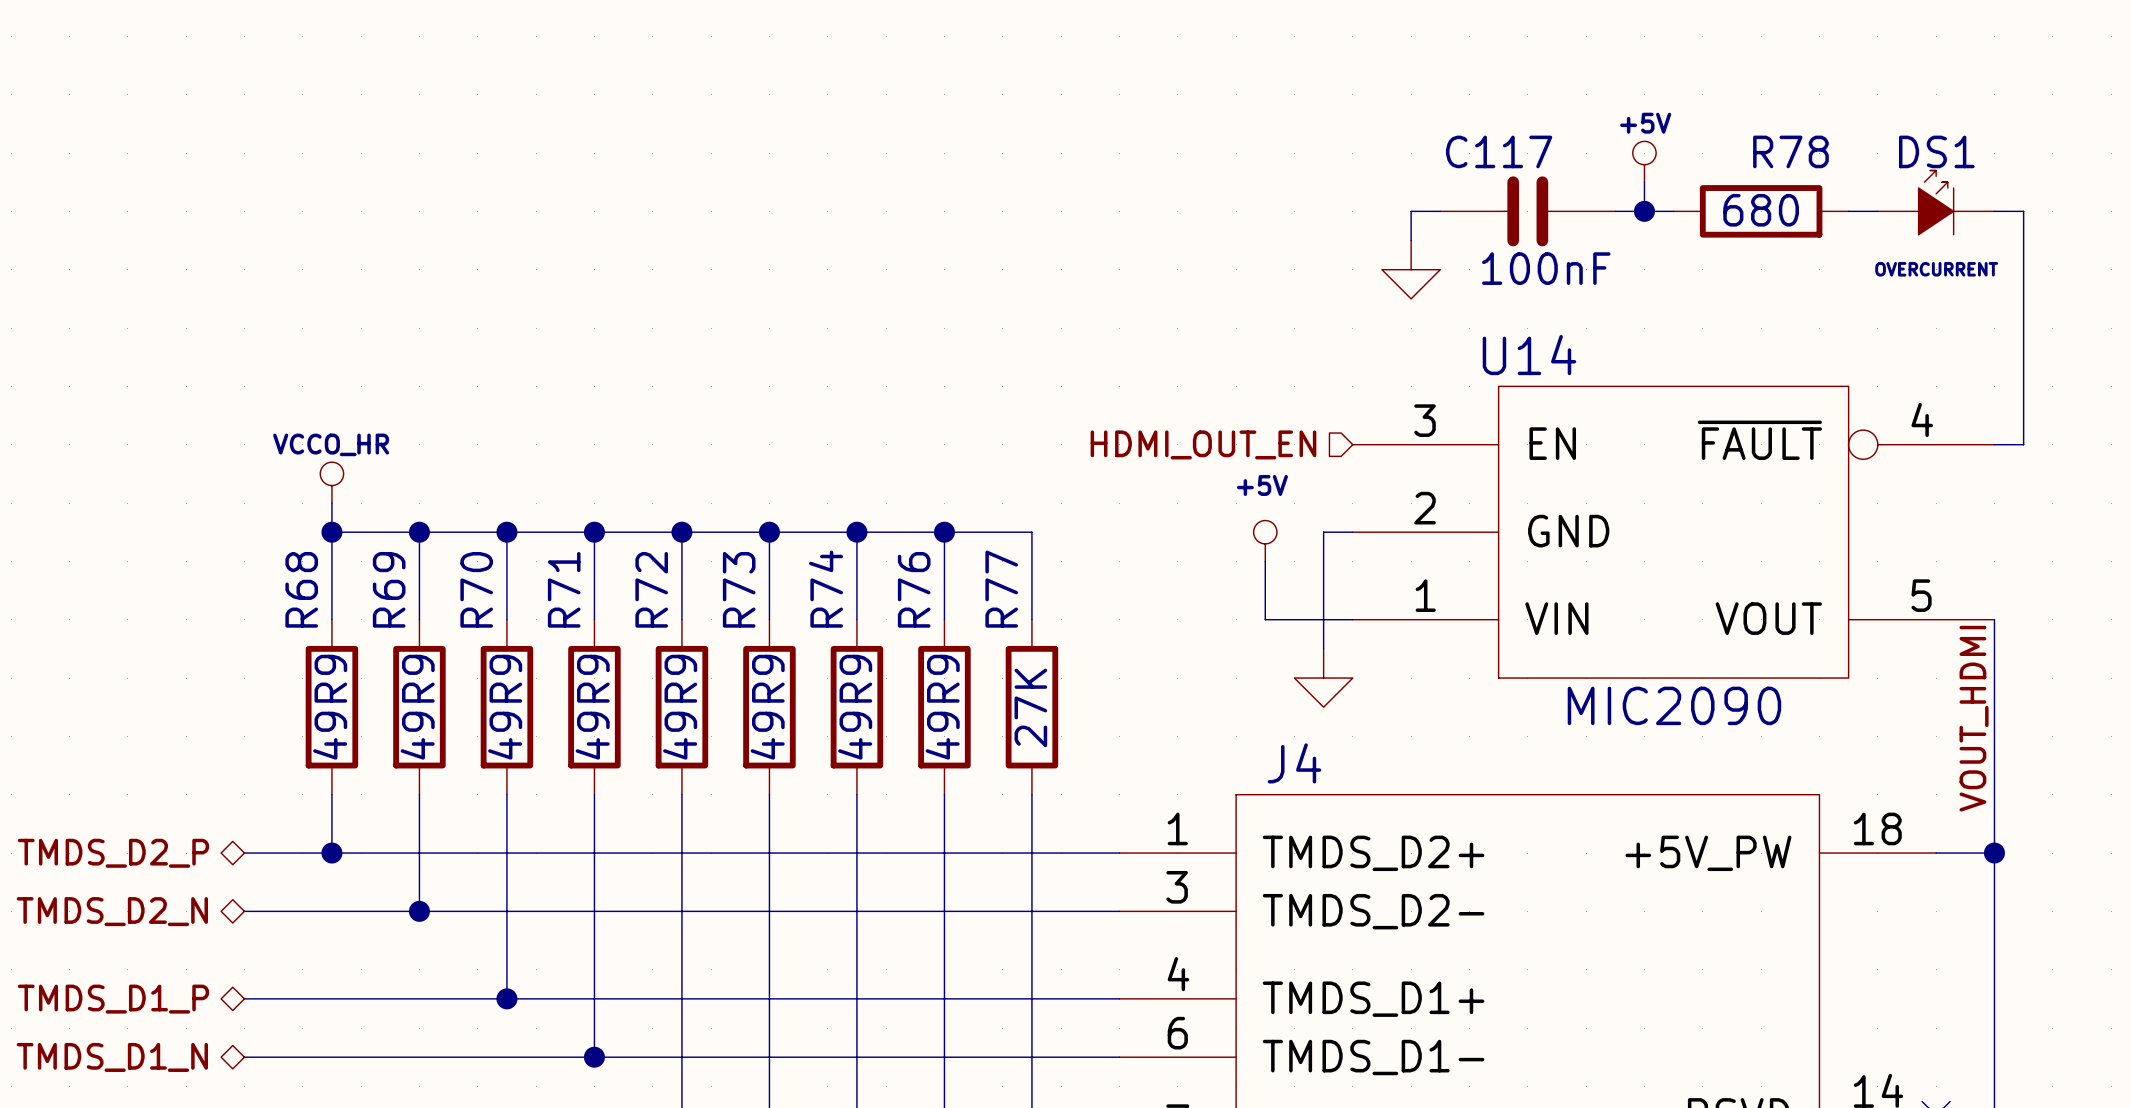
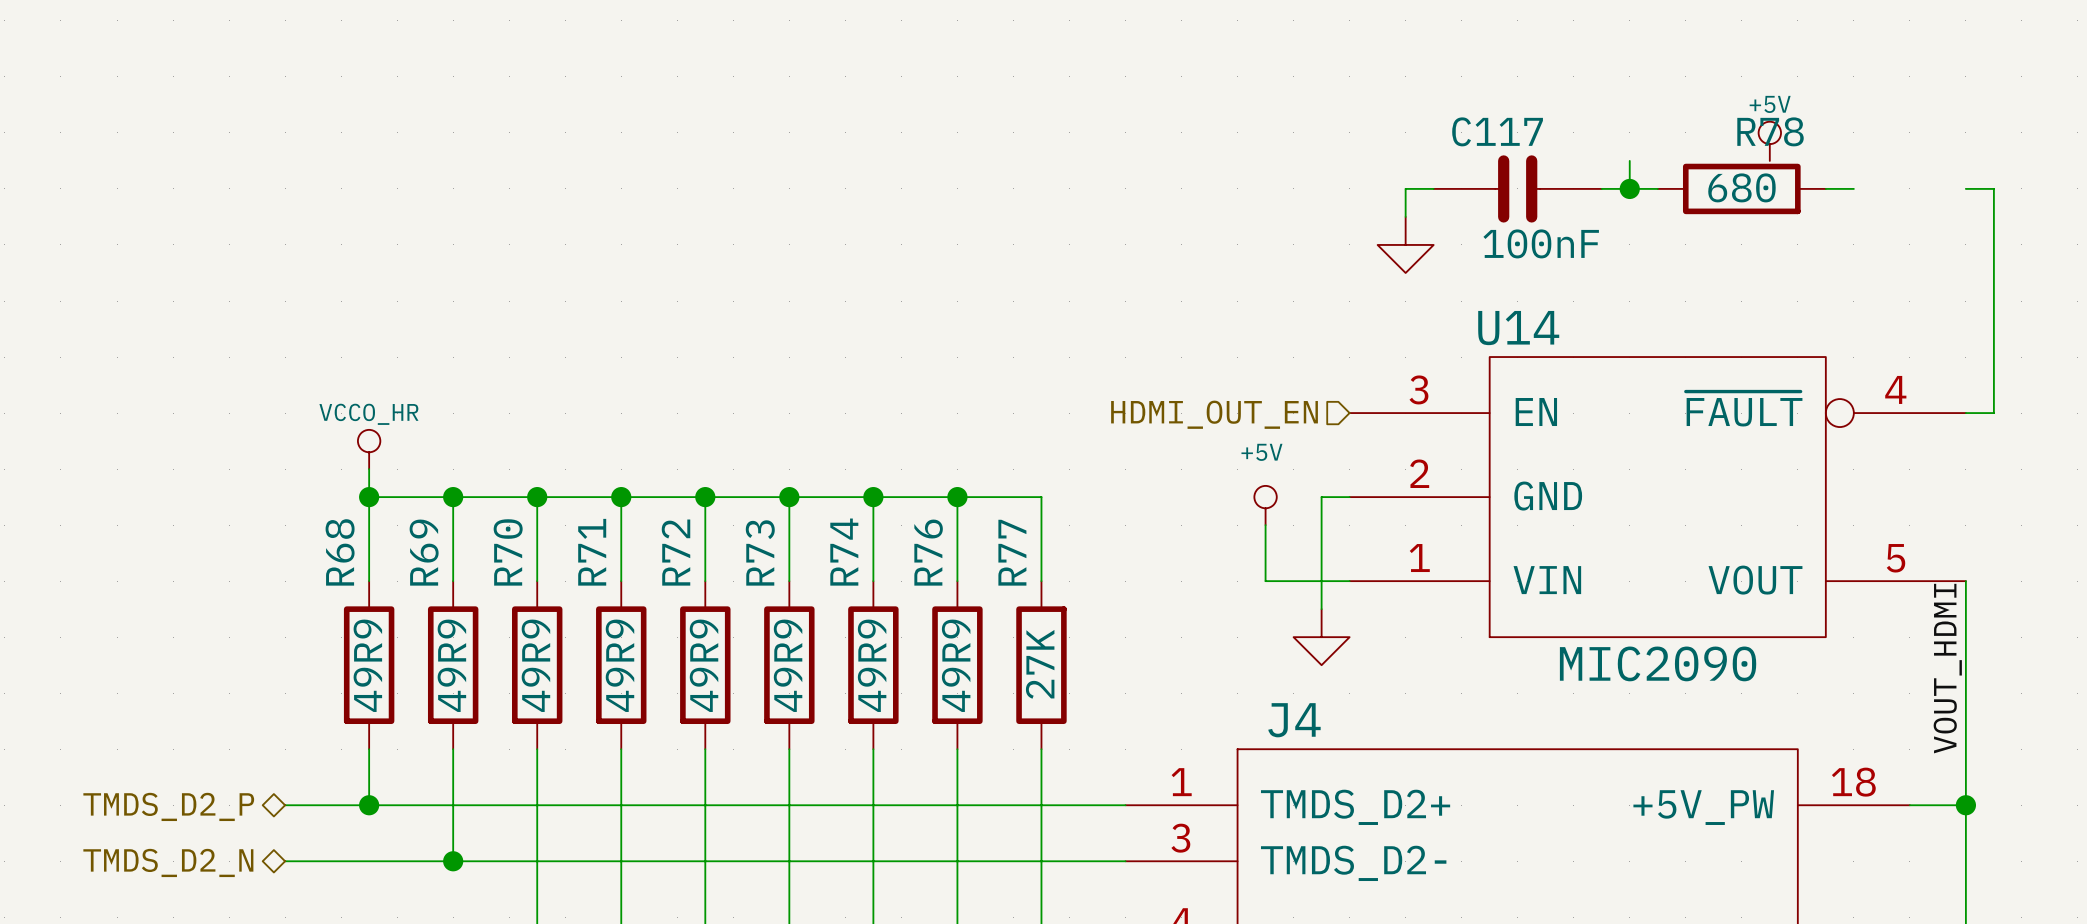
power symbol position: +5V (1644, 161) -> +5V (1769, 141)
DS1: OVERCURRENT (1936, 202) -> none

